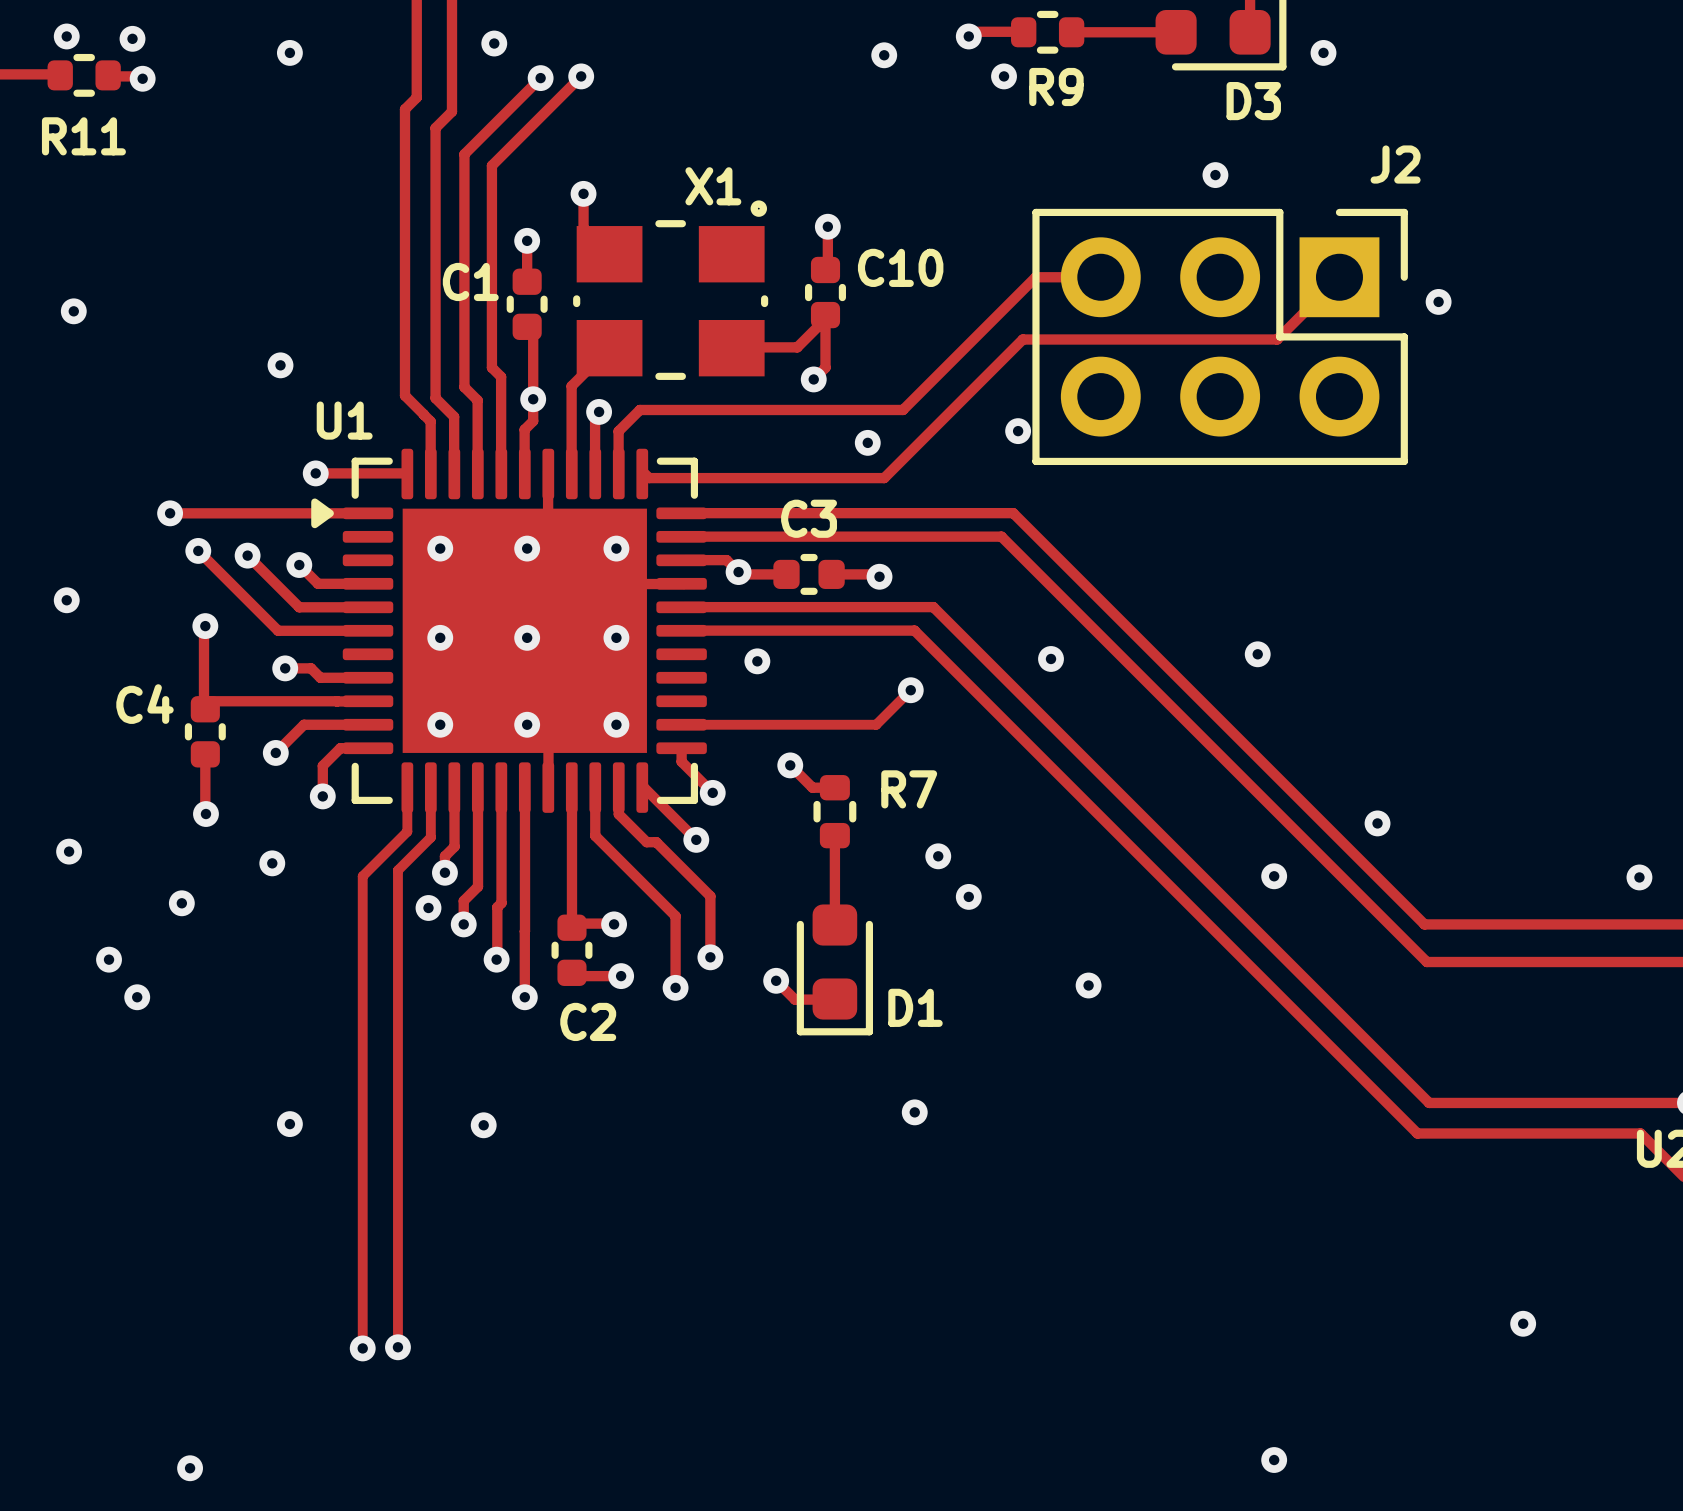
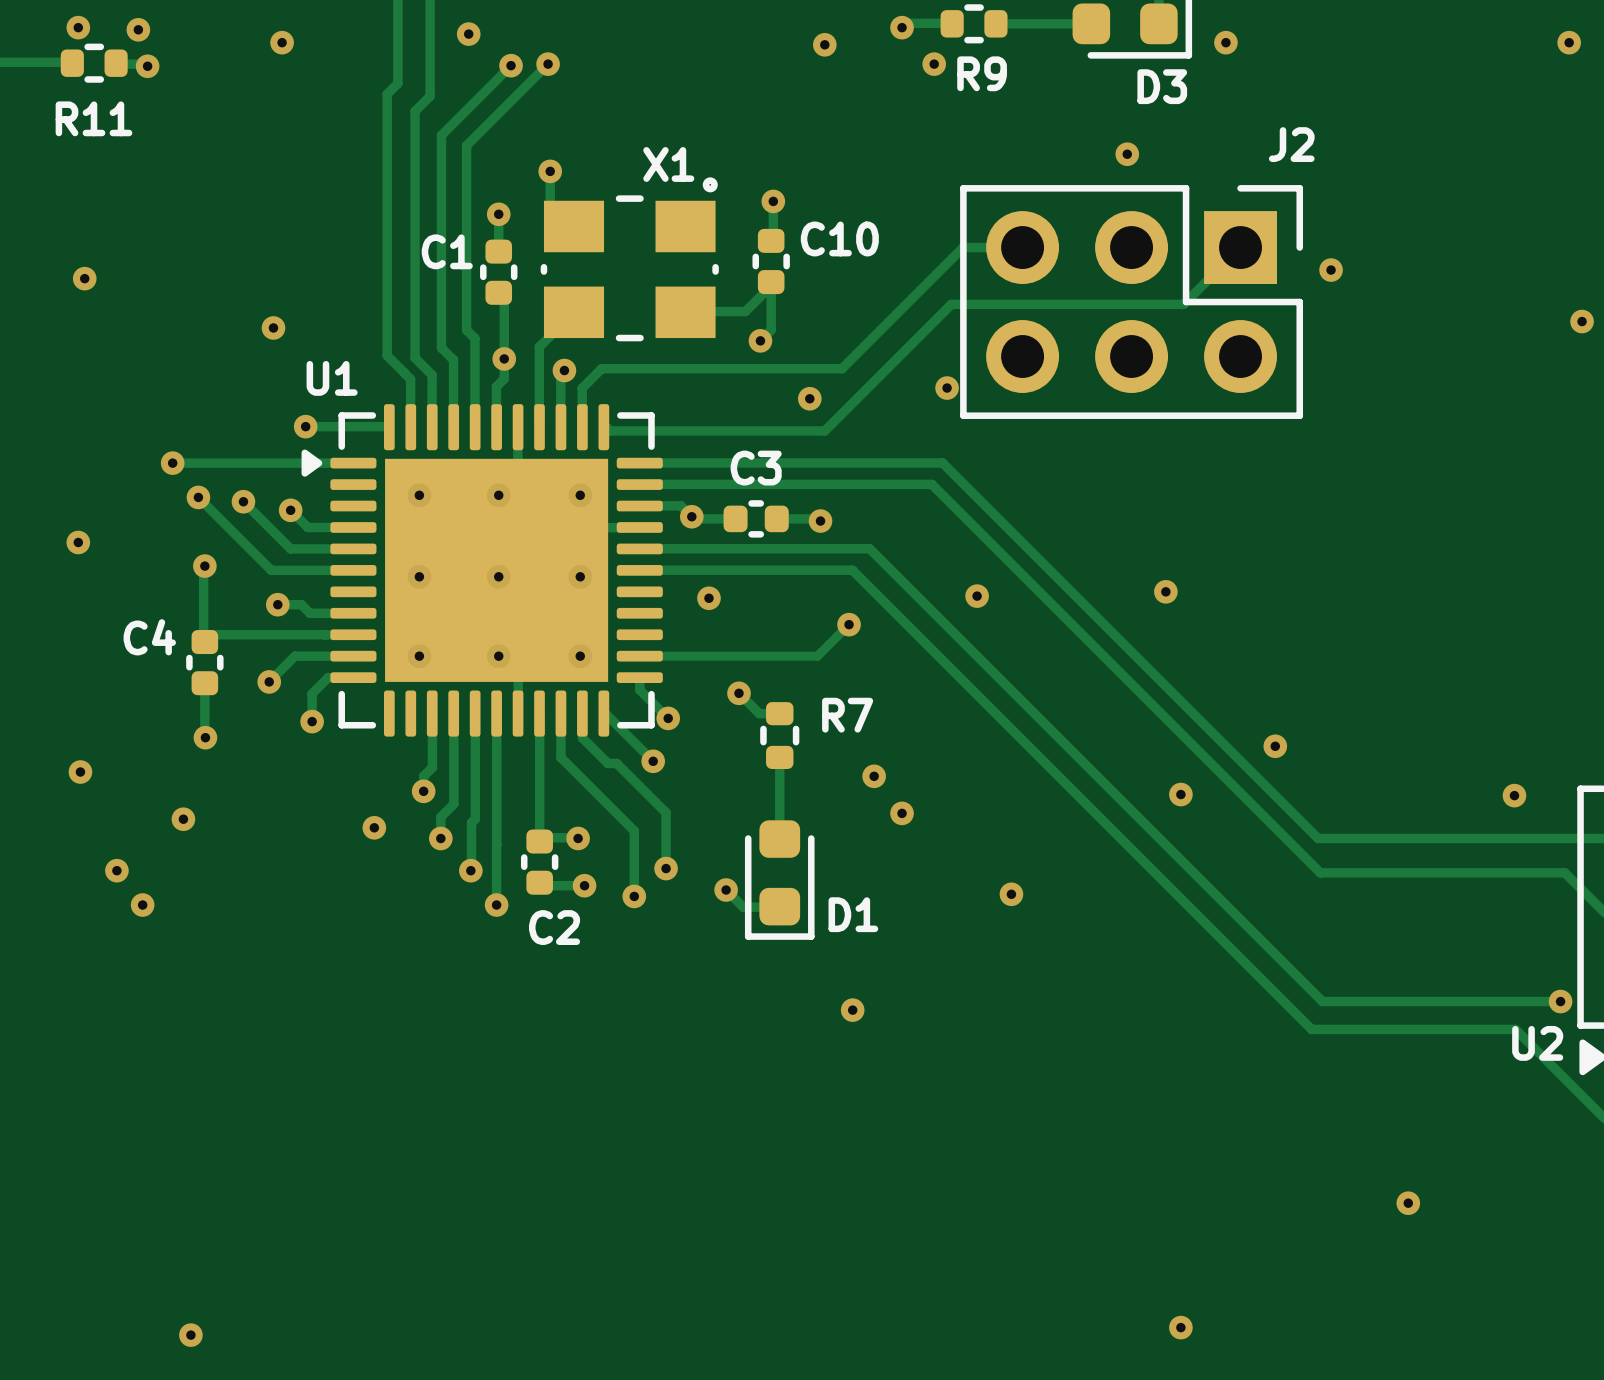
track: (407, 787) (407, 831) (362, 876) (362, 1348) -> none
track: (430, 787) (430, 837) (397, 870) (397, 1347) -> none
via: (272, 863) -> none
via position: (428, 907) -> (374, 827)
via: (289, 1124) -> none
via: (483, 1125) -> none
via: (397, 1347) -> none
via: (362, 1348) -> none

